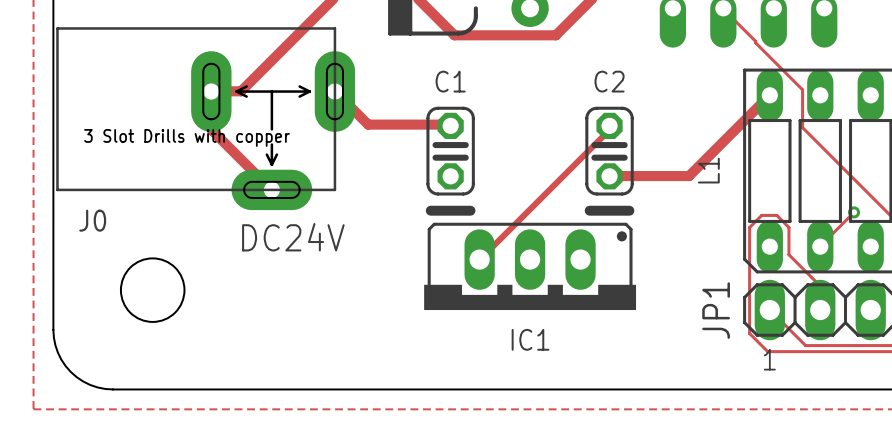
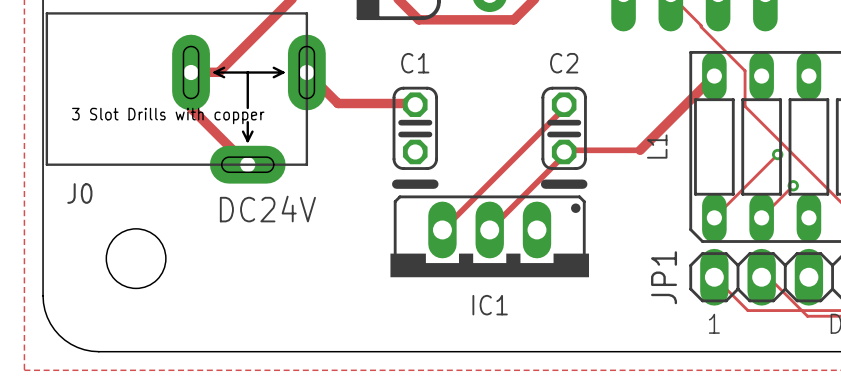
track: (690, 174) (609, 176) -> (640, 150) (566, 150) (563, 155) (489, 229)
track: none -> (777, 154) (714, 217)
via: none -> (777, 154)
track: (820, 310) (819, 285) (788, 254) (788, 227) (776, 215) (761, 215) (749, 227) (749, 333) (767, 351) (869, 351) -> (761, 277) (769, 277) (807, 316)

